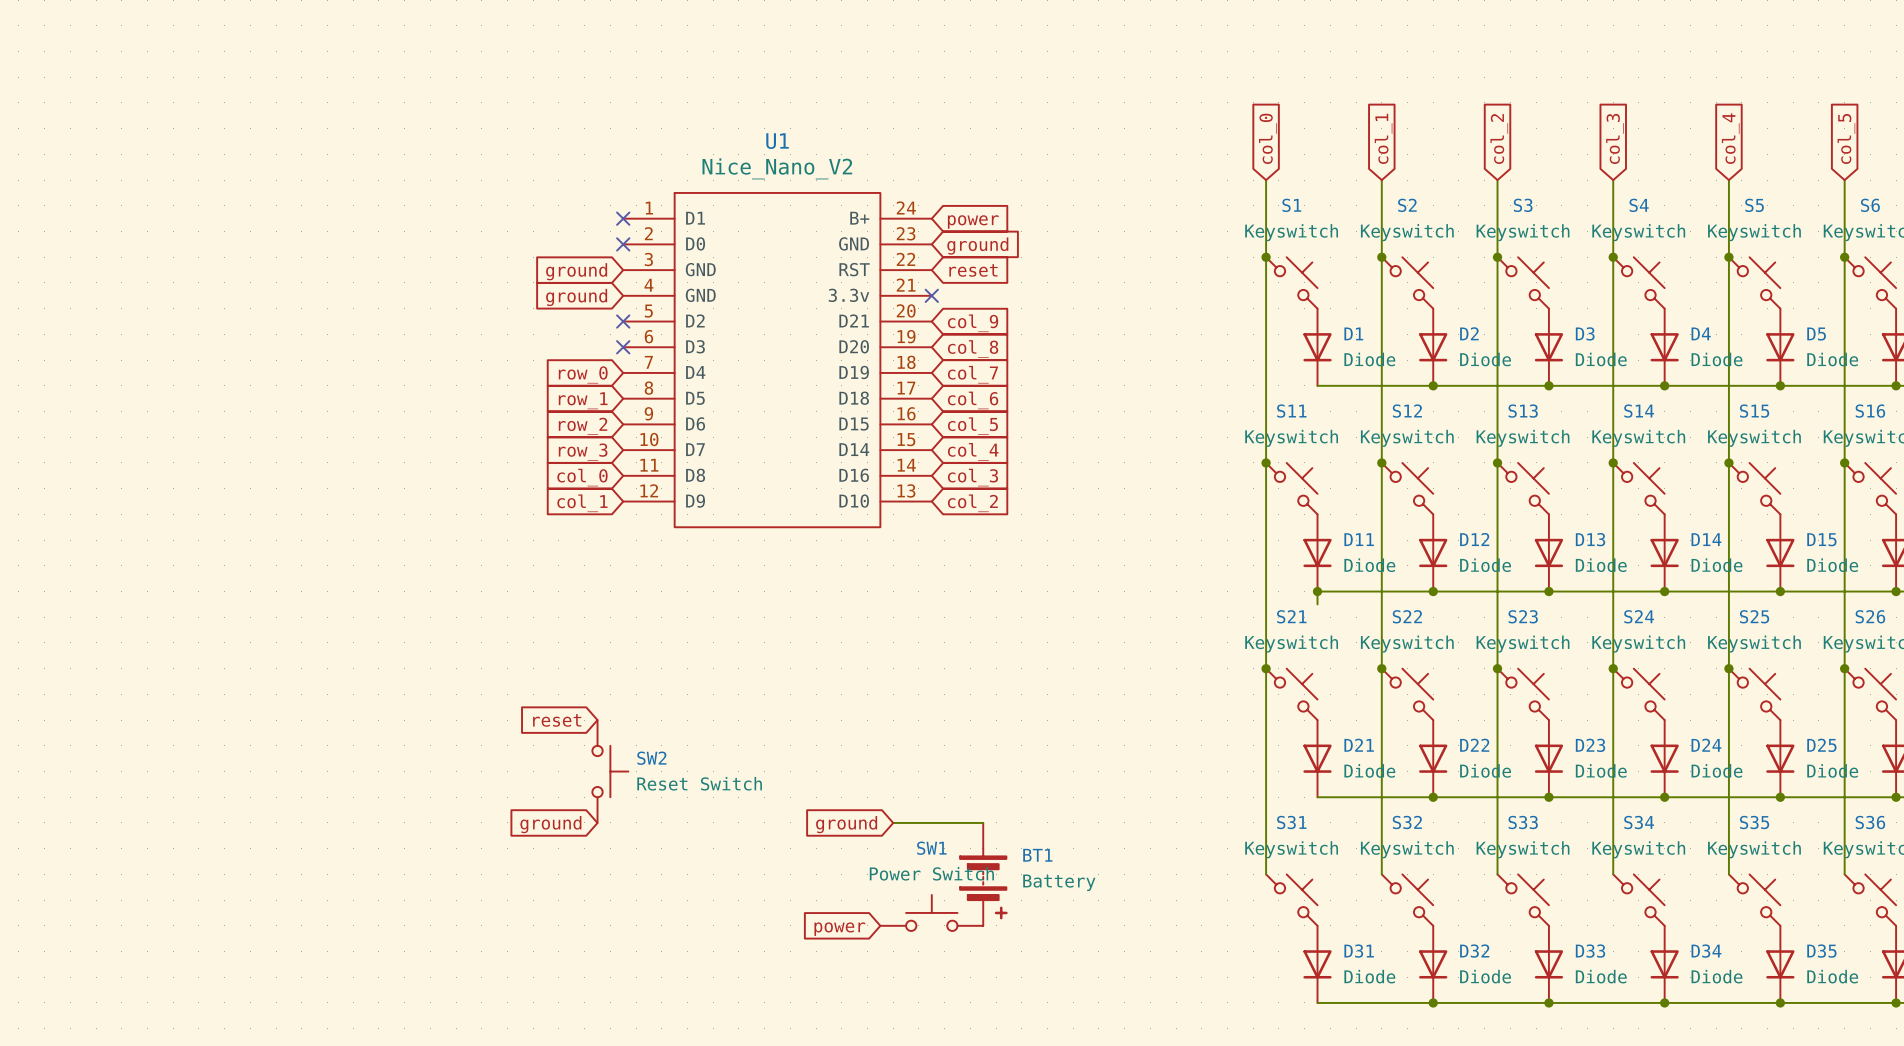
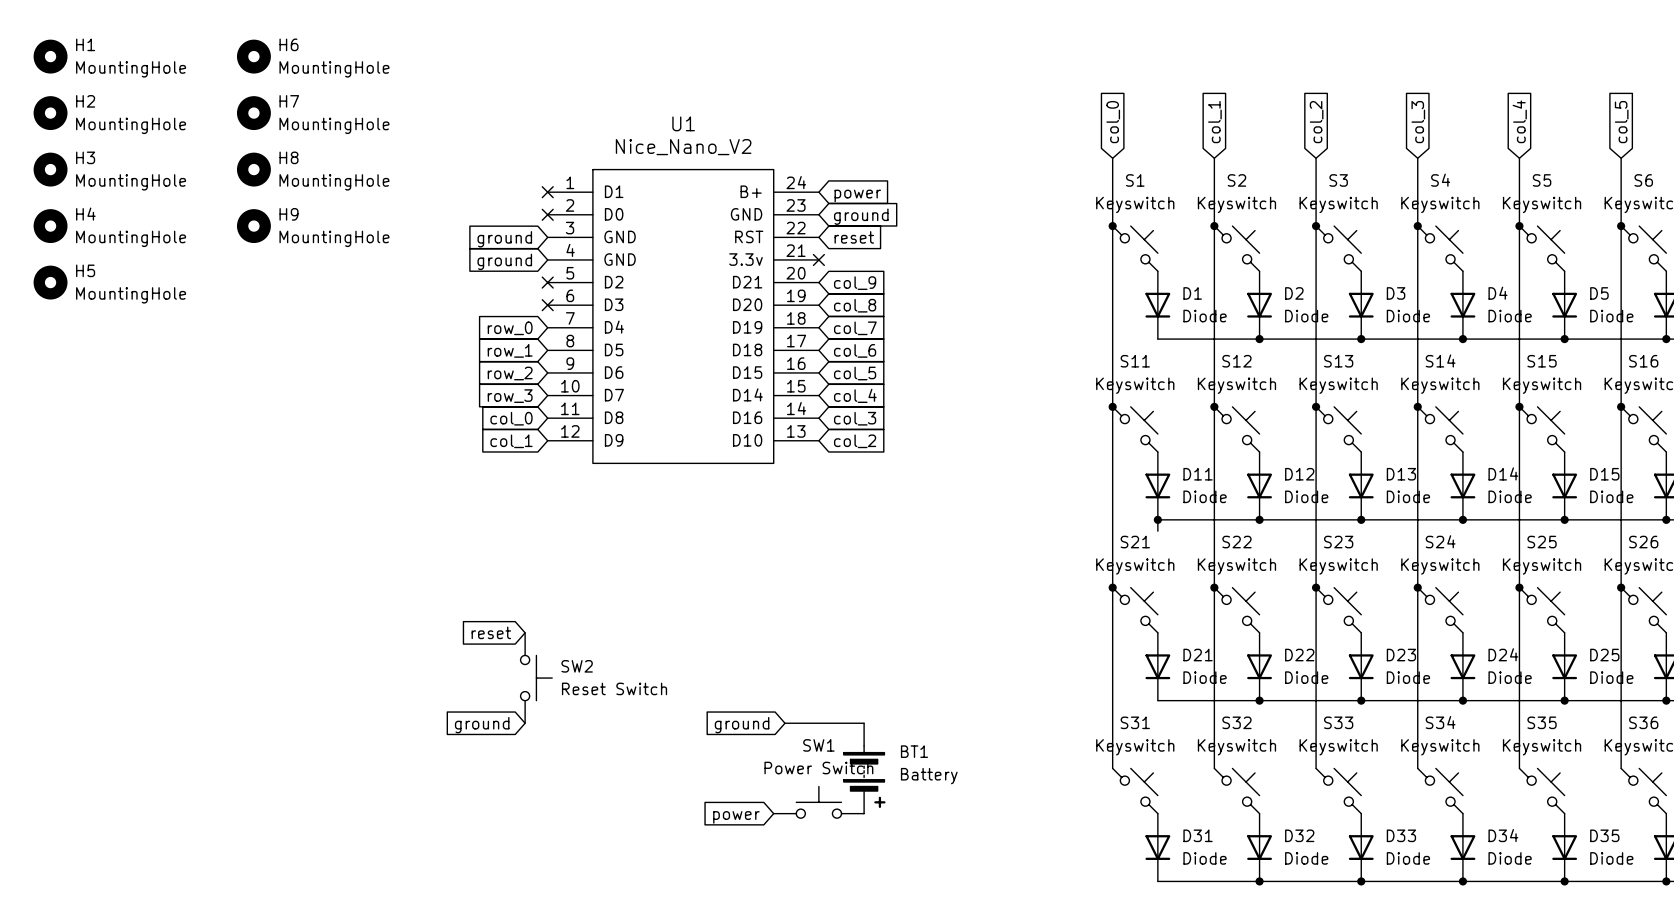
H1: none -> MountingHole (50, 56)
H6: none -> MountingHole (253, 56)
H2: none -> MountingHole (50, 113)
H7: none -> MountingHole (253, 113)
H3: none -> MountingHole (50, 169)
H8: none -> MountingHole (253, 169)
H4: none -> MountingHole (50, 226)
H9: none -> MountingHole (253, 226)
H5: none -> MountingHole (50, 282)

